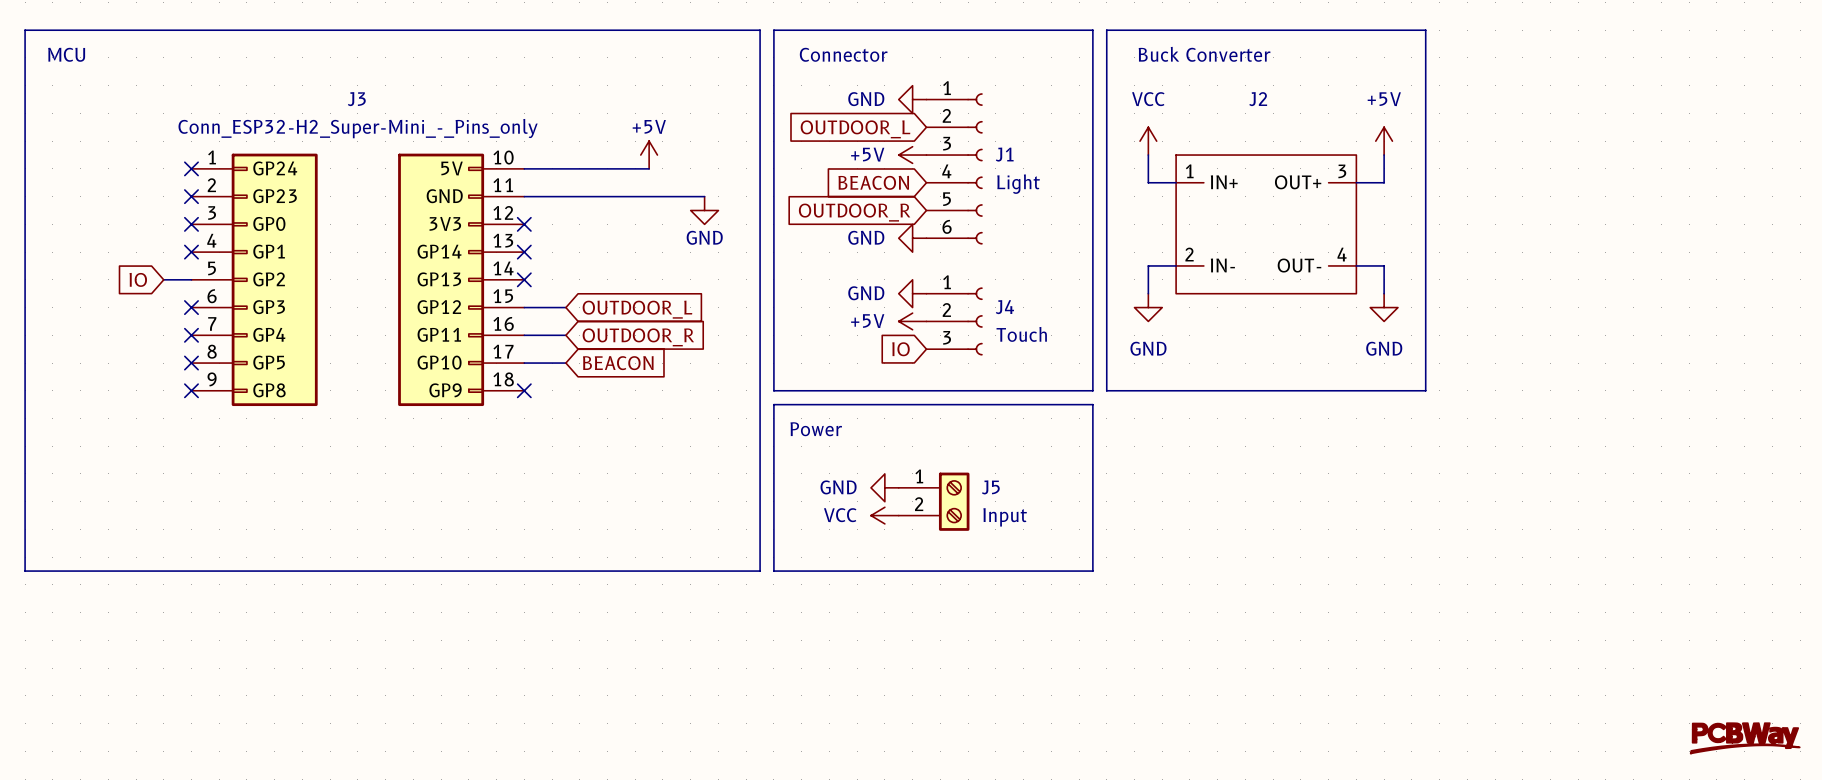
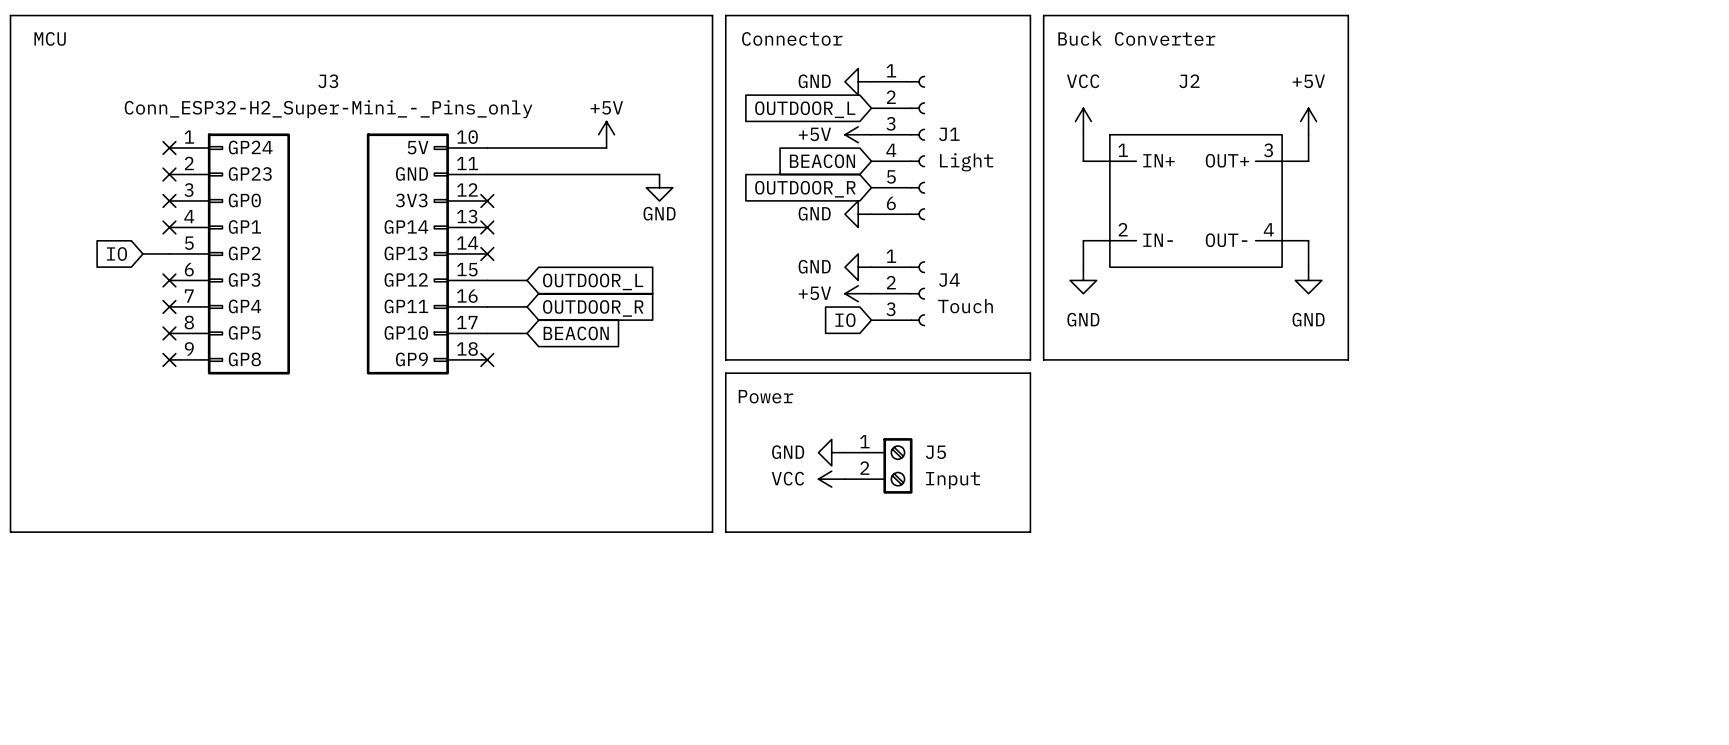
power symbol: (1745, 738) -> none

